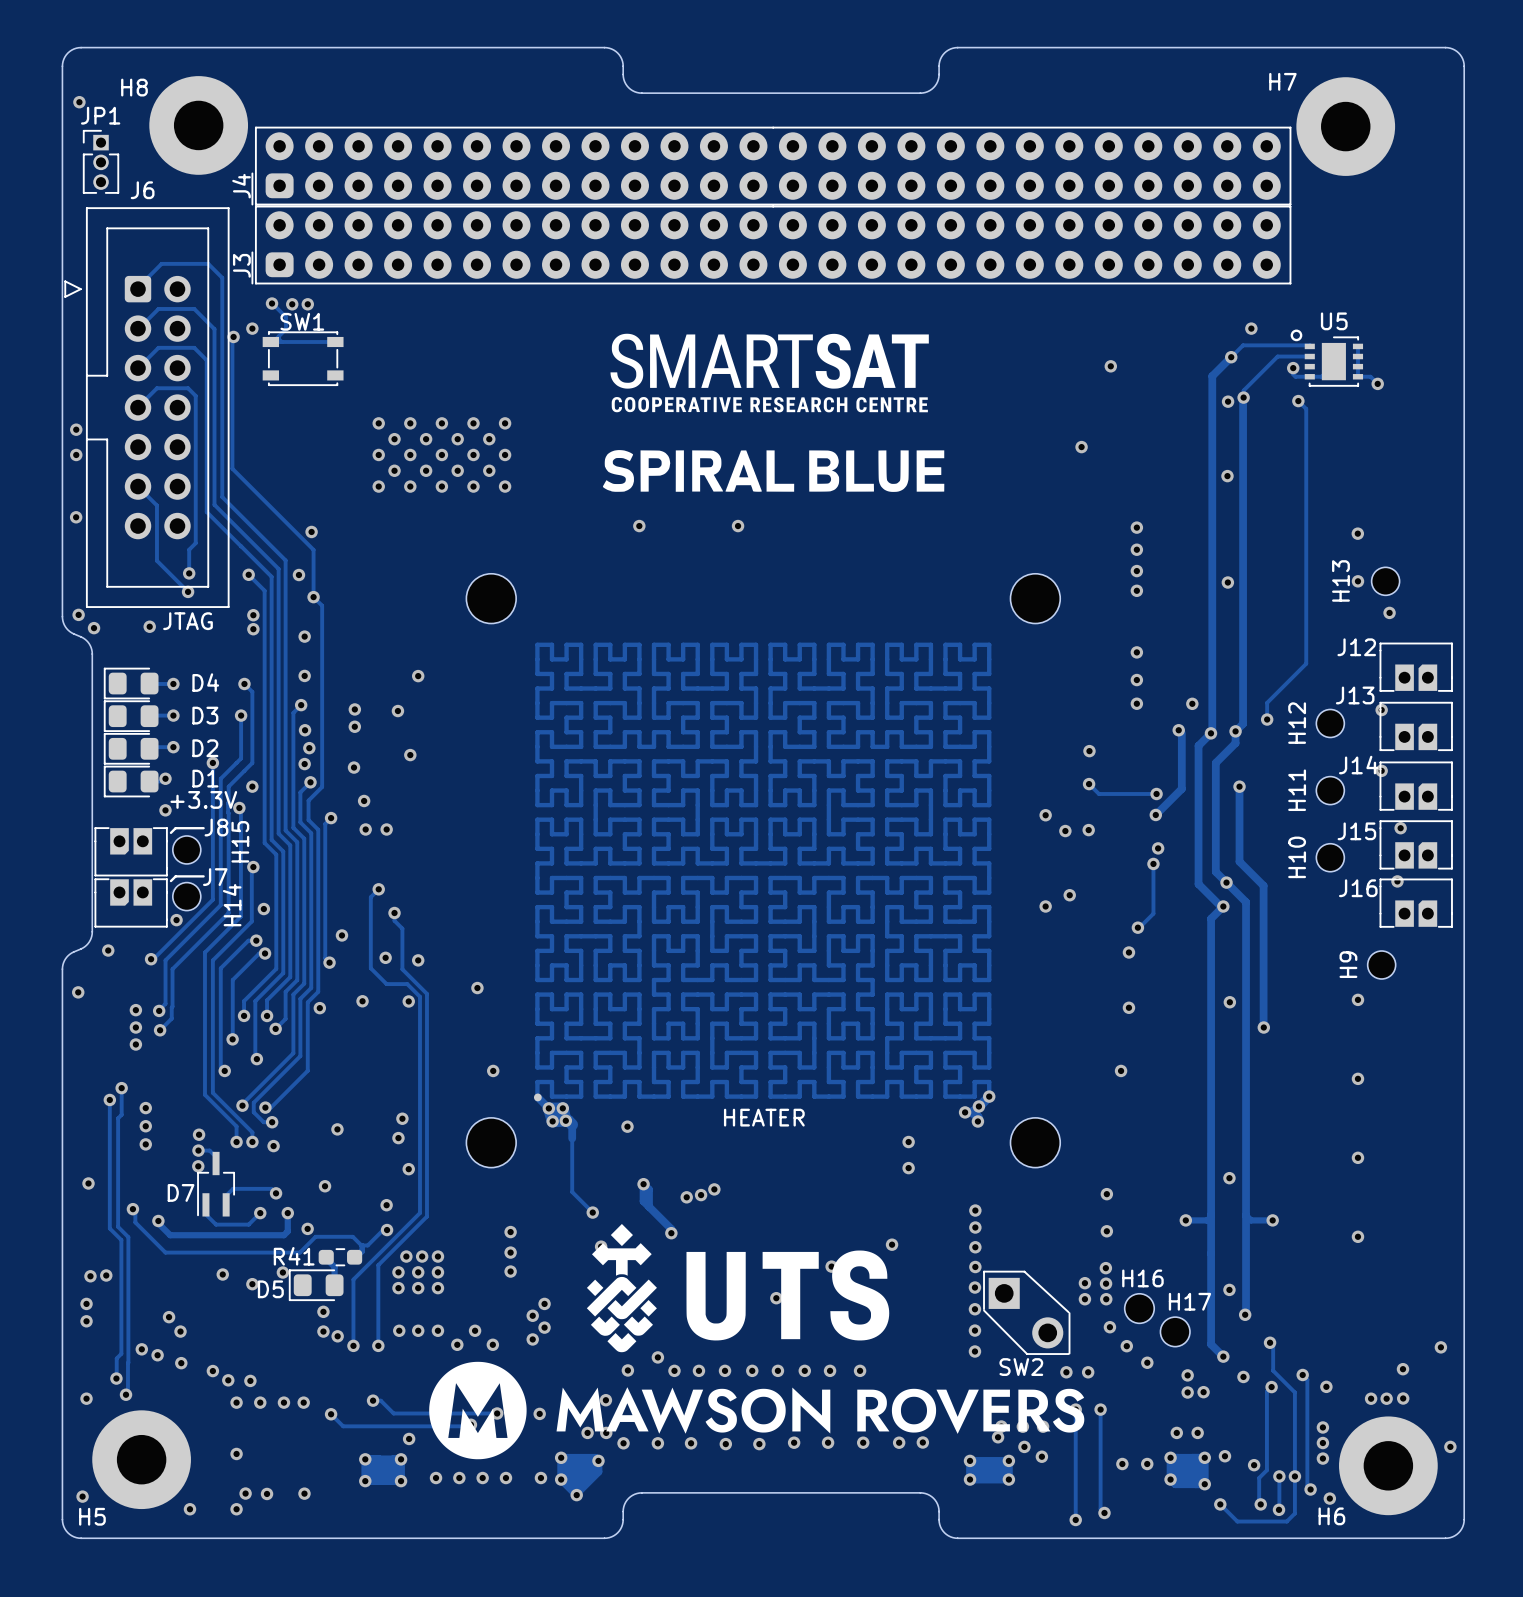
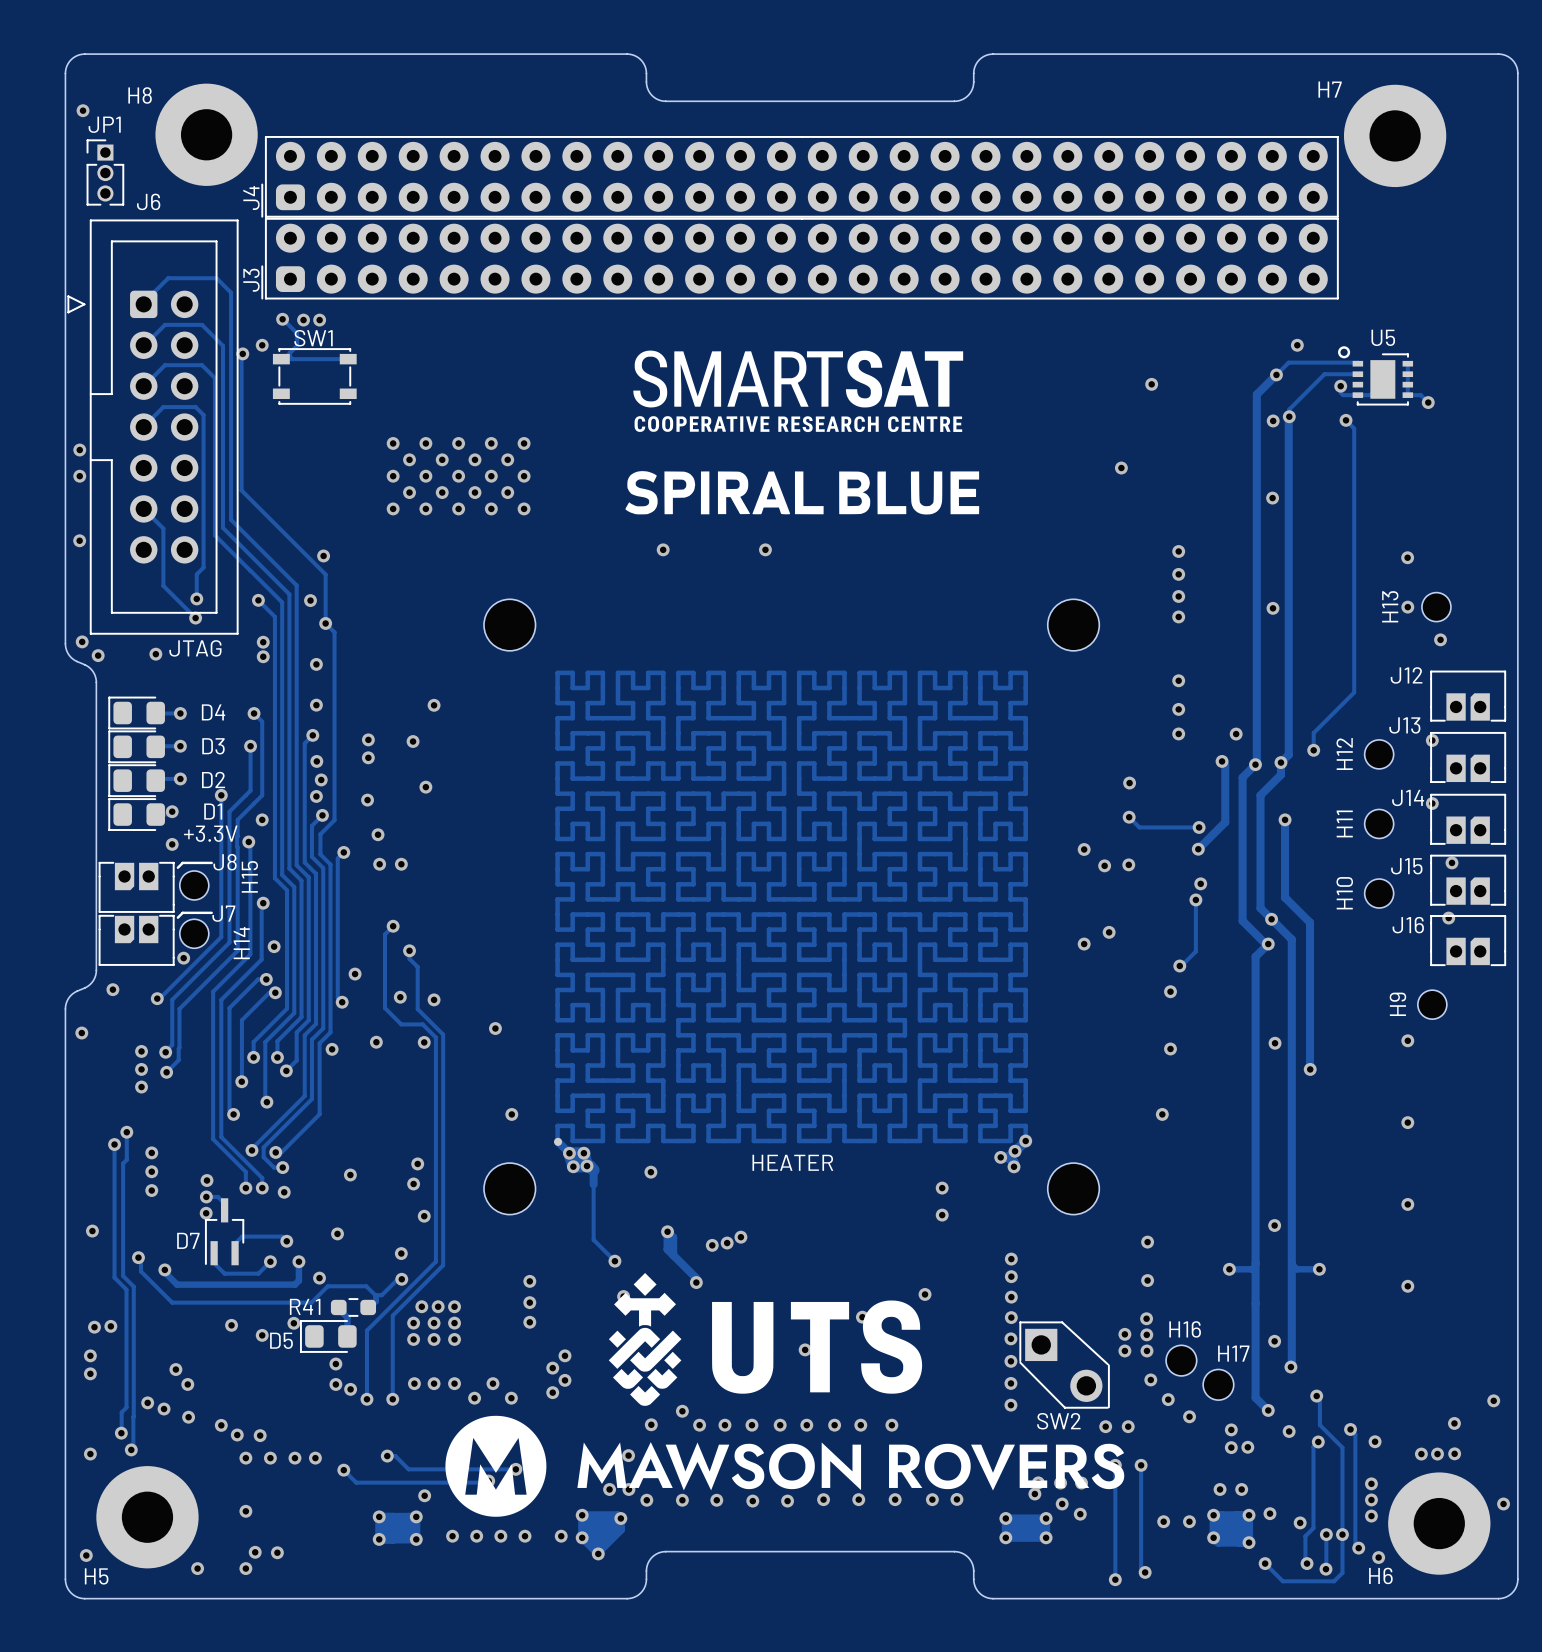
via: (539, 1413) -> none
via: (304, 1493) -> none

